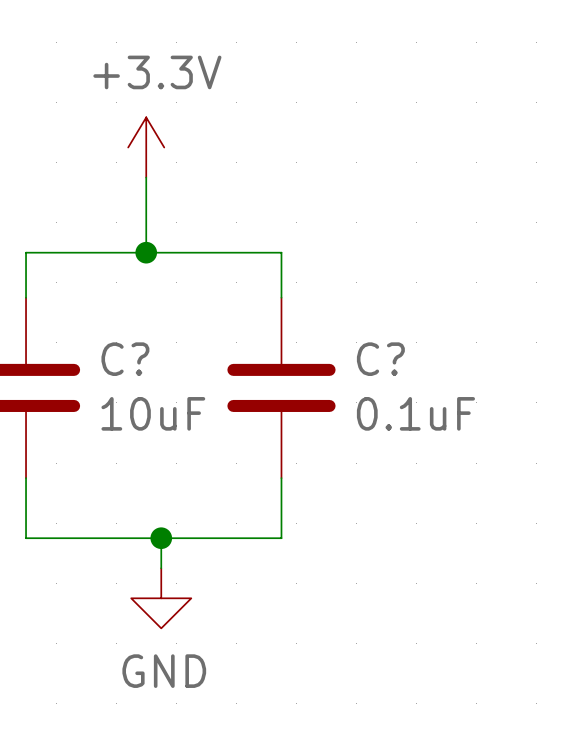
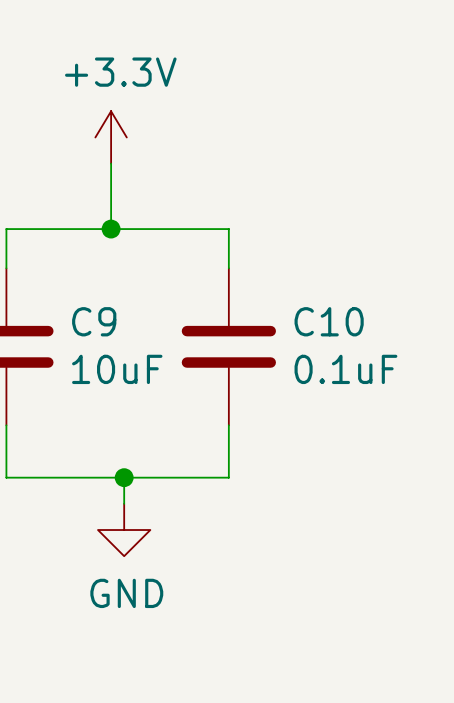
C? name: C? (125, 359) -> C9 (94, 321)
C? name: C? (380, 359) -> C10 (329, 321)

